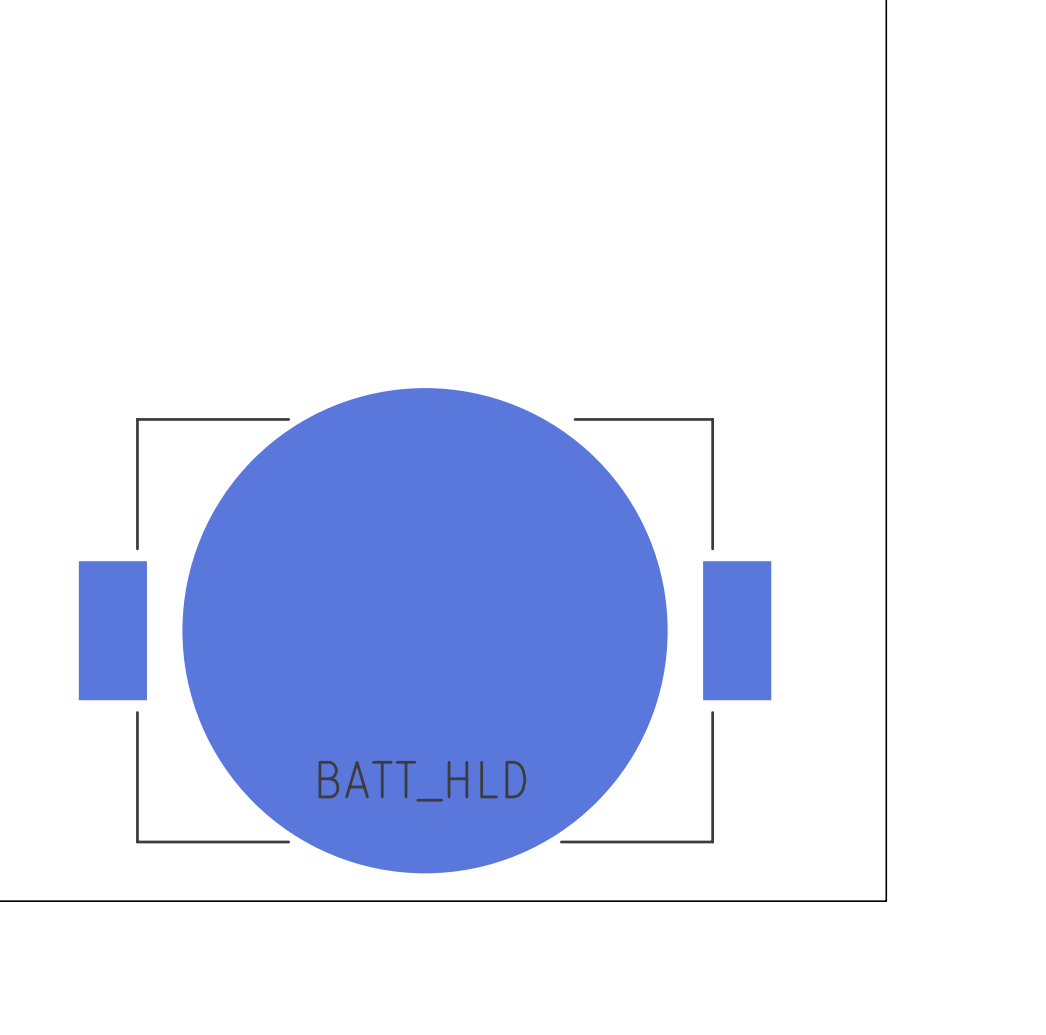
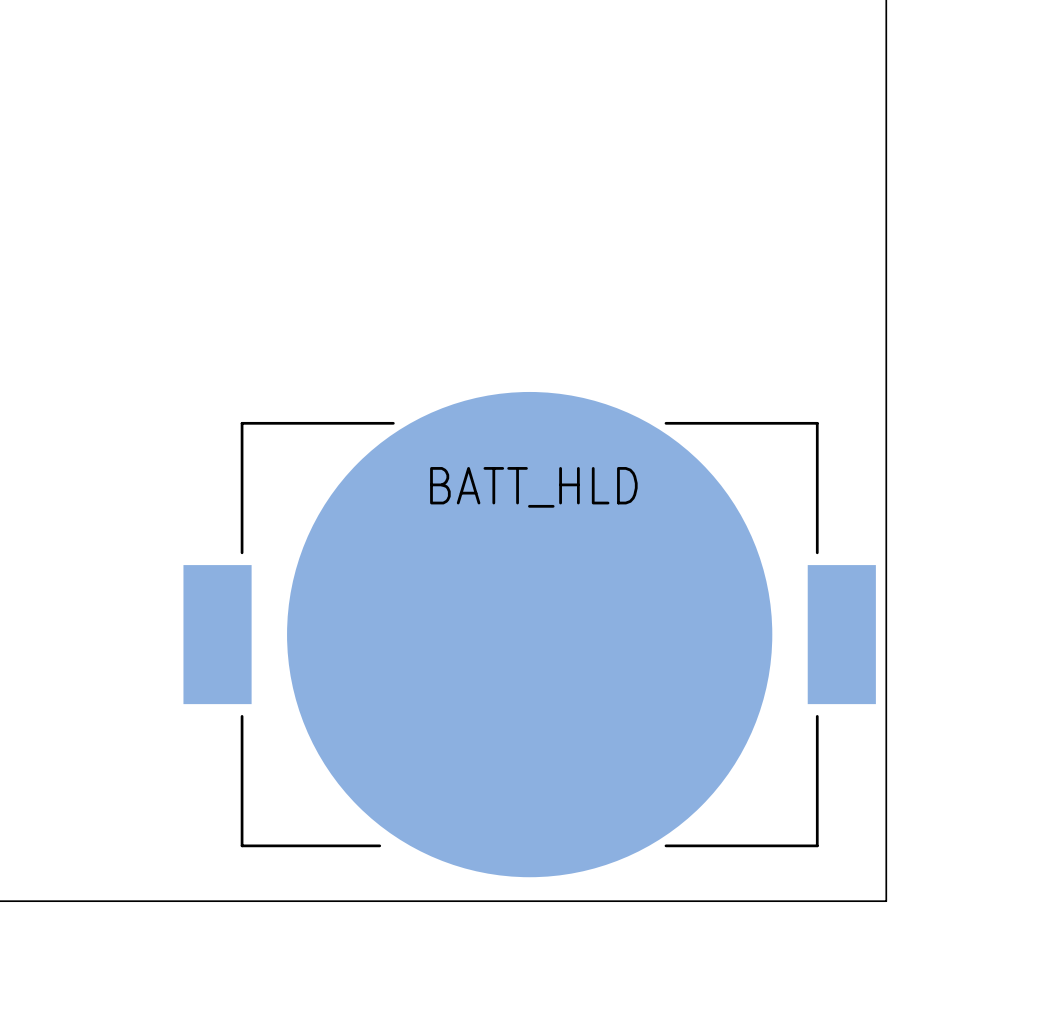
BATT_HLD rotation: 0° (425, 630) -> 180° (529, 634)

